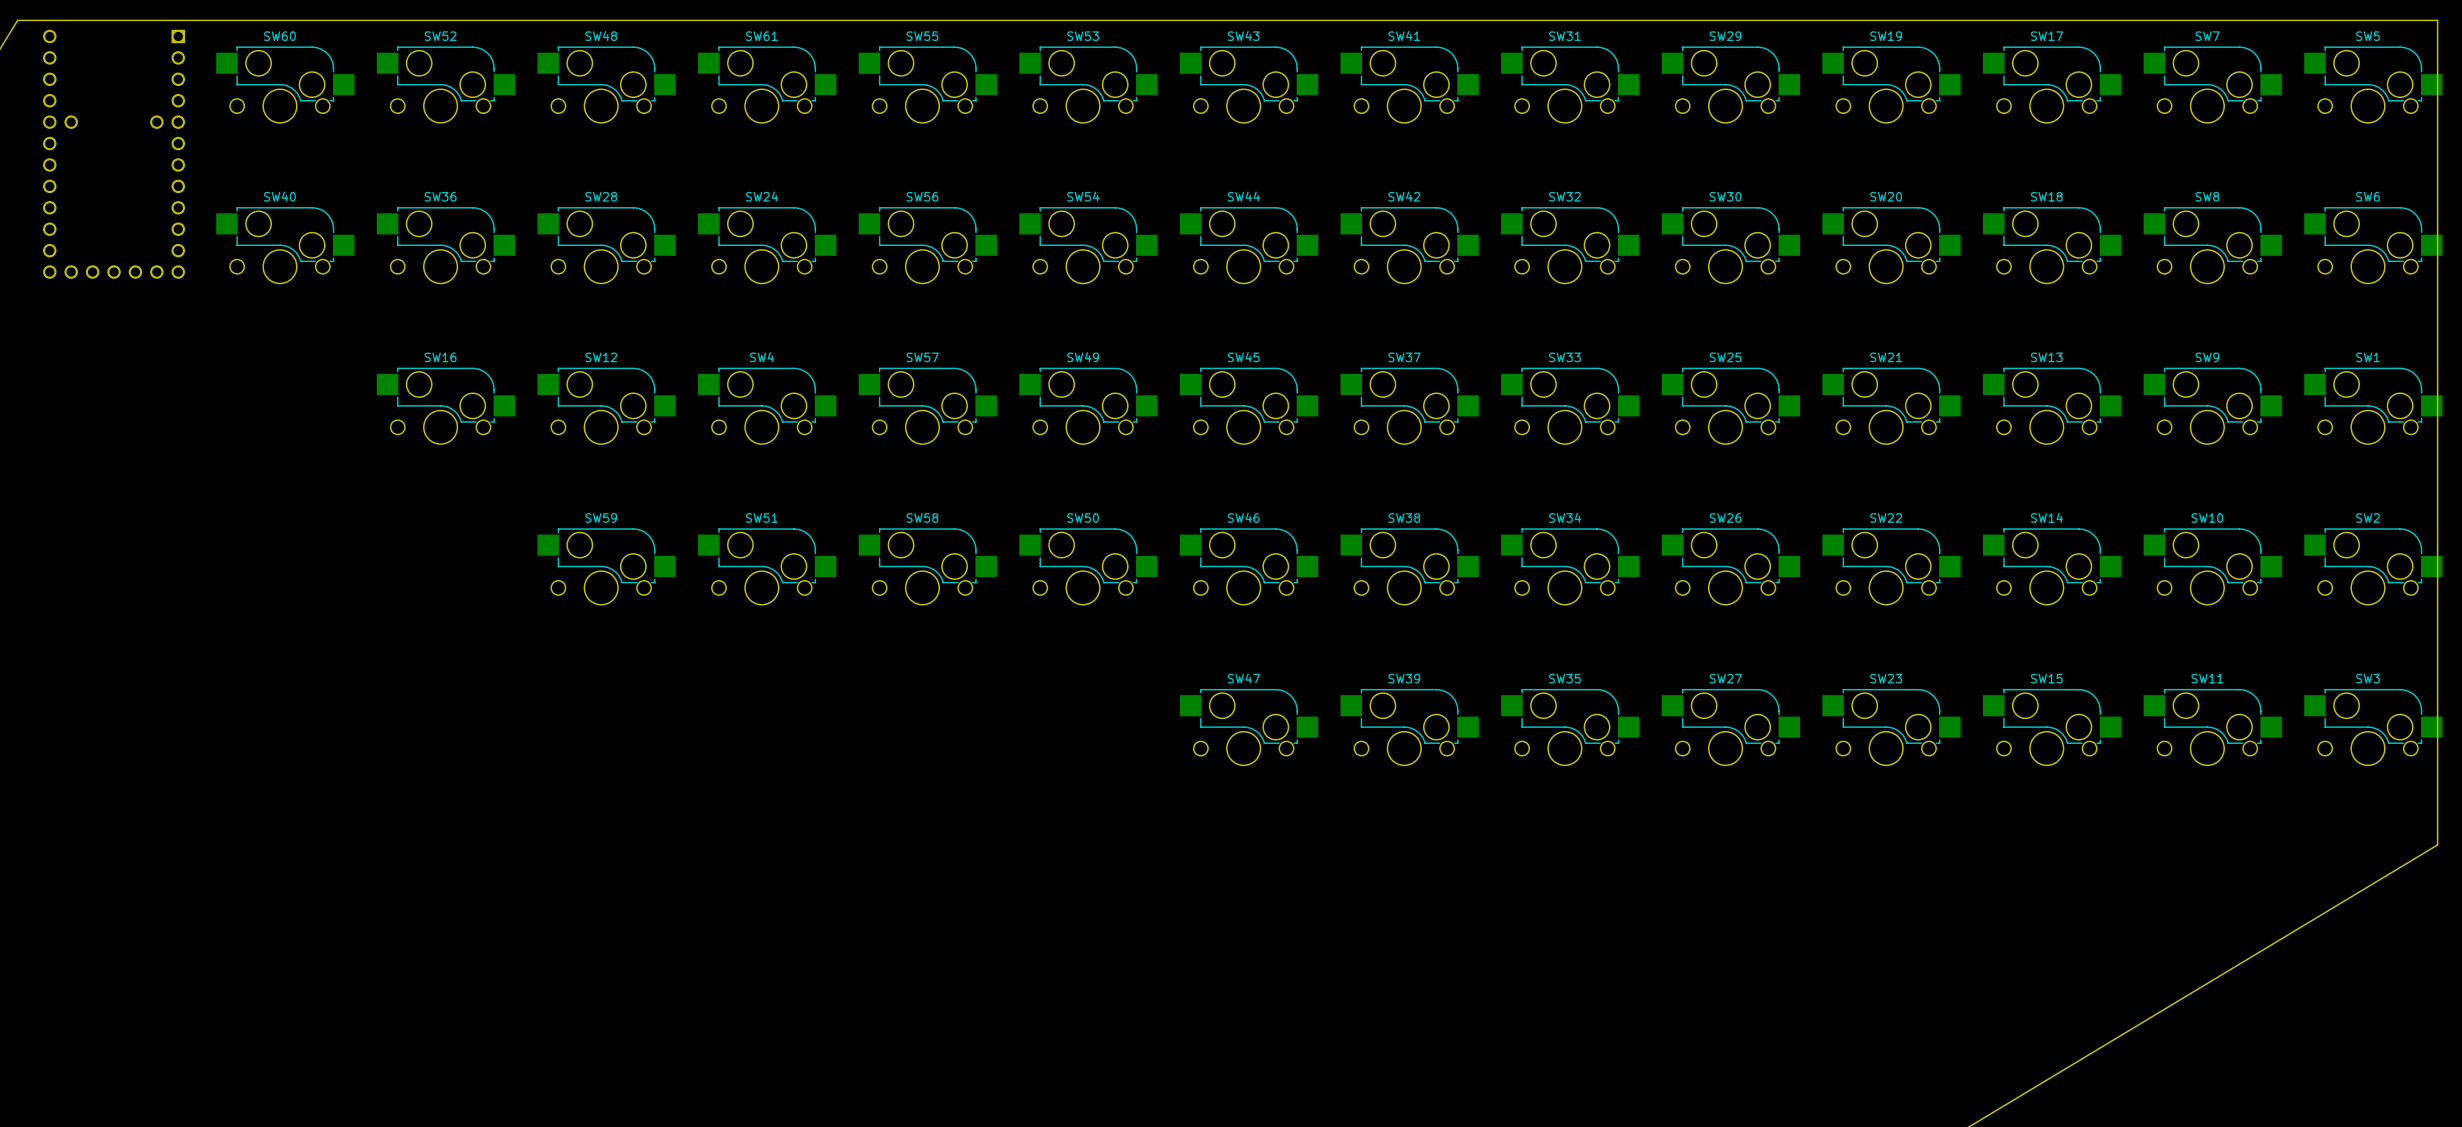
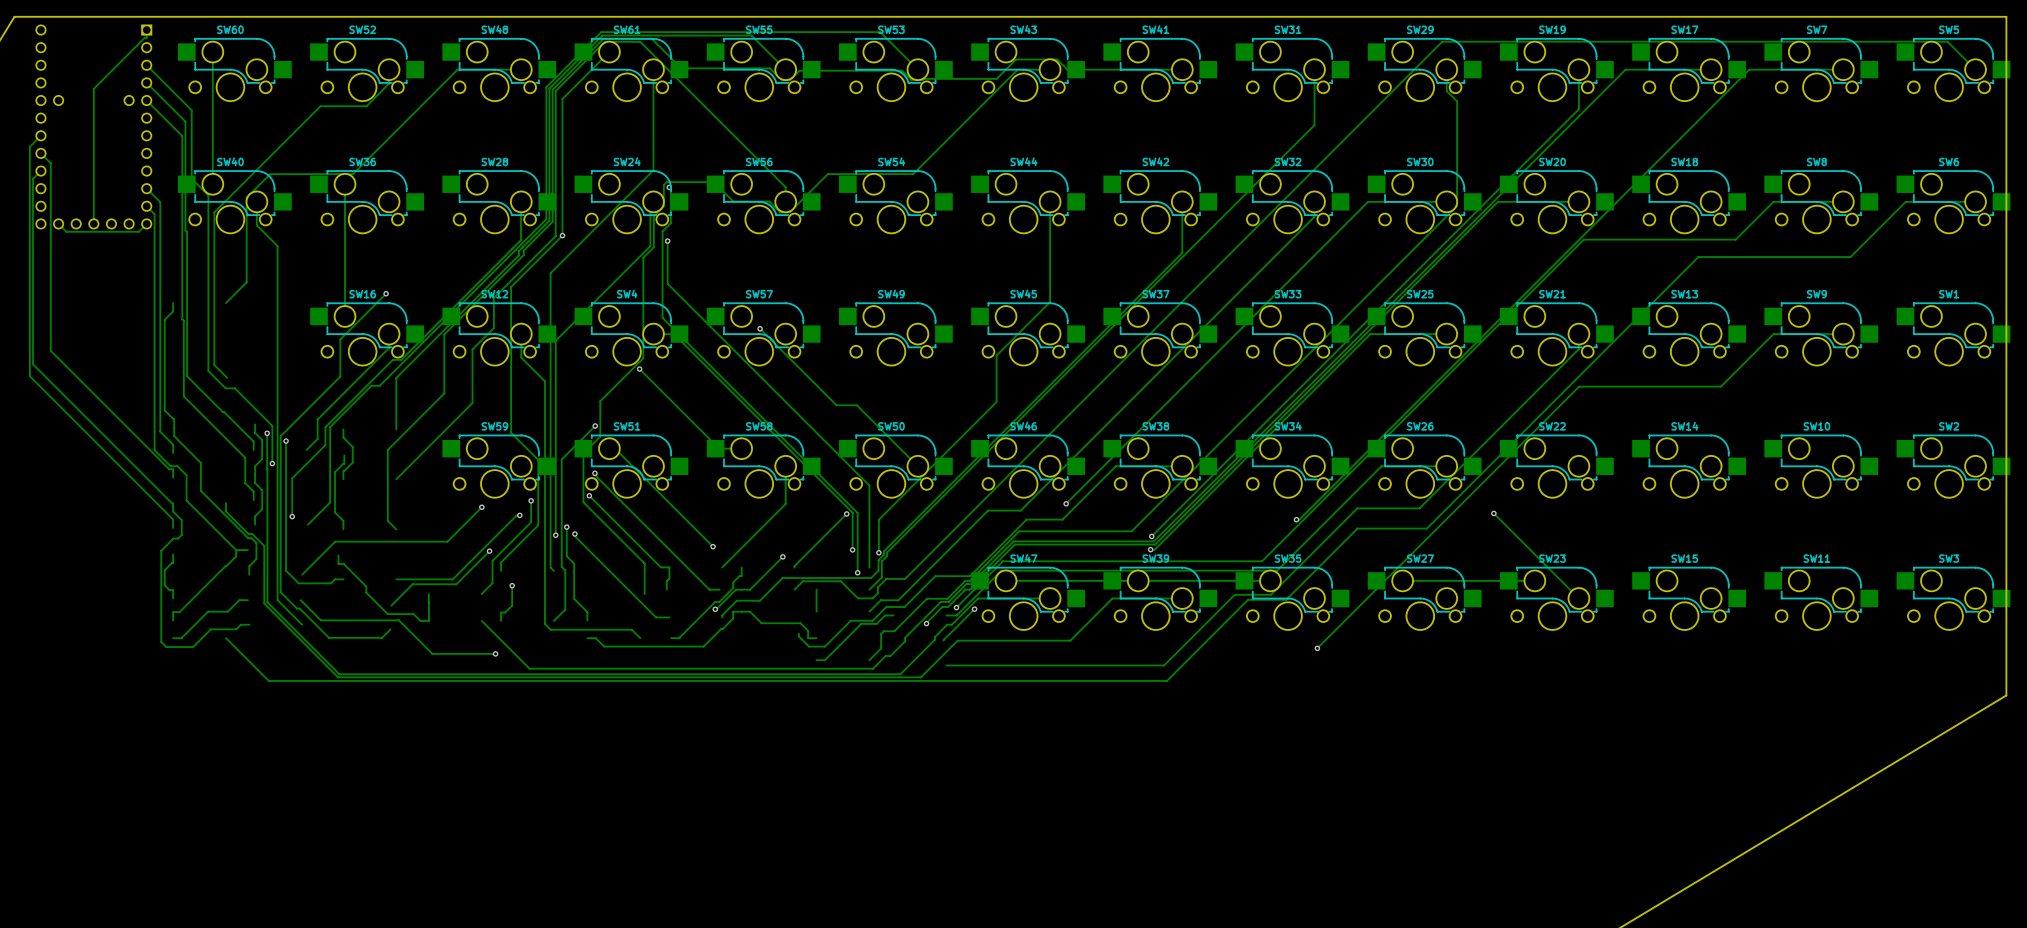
track: none -> (146, 30) (146, 37) (93, 88) (93, 223)
track: none -> (212, 52) (212, 184)
track: none -> (609, 52) (562, 99) (562, 235) (511, 286) (511, 432) (538, 459) (538, 525) (501, 562) (501, 570)
track: none -> (146, 65) (191, 110) (191, 178) (208, 195) (208, 371) (225, 388) (234, 388) (272, 425) (272, 463)
track: none -> (389, 69) (389, 83) (366, 106) (320, 106) (214, 212) (214, 364) (227, 377)
track: none -> (521, 69) (457, 69) (353, 174) (270, 174) (246, 197) (246, 282) (226, 302)
track: none -> (653, 69) (653, 170) (550, 273) (550, 567) (553, 570)
track: none -> (785, 69) (751, 35) (602, 35) (549, 88) (549, 220) (518, 251) (518, 255) (396, 377) (396, 429)
track: none -> (917, 69) (880, 32) (601, 32) (546, 87) (546, 219) (379, 385) (371, 385) (330, 427) (330, 502) (308, 524)
track: none -> (1050, 69) (1017, 69) (913, 174) (827, 174) (789, 212) (780, 212) (769, 201) (733, 201) (713, 182) (666, 182) (663, 185) (663, 206) (653, 216) (653, 247) (643, 257) (643, 358) (600, 401) (600, 436) (583, 453) (583, 502) (644, 563) (644, 594)
track: none -> (1182, 69) (1067, 69) (1057, 59) (1016, 59) (996, 78) (911, 79) (902, 70) (799, 70) (790, 80) (781, 80) (769, 68) (681, 68) (651, 38) (603, 38) (552, 89) (552, 221) (523, 250) (523, 255) (444, 334) (444, 393) (387, 449) (387, 520) (396, 529)
track: none -> (1314, 69) (1314, 125) (887, 552) (887, 556) (881, 561) (881, 577) (869, 589)
track: none -> (1446, 69) (1446, 90) (1457, 101) (1457, 205) (1131, 531) (1019, 531) (969, 580) (965, 580) (947, 598) (926, 598) (894, 631) (883, 631) (881, 633) (881, 648) (869, 660)
track: none -> (1578, 69) (1578, 109) (1151, 536)
track: none -> (1711, 69) (1625, 69) (1153, 541) (1013, 541) (970, 584) (966, 584) (948, 601) (940, 601) (905, 637) (905, 641) (890, 656) (885, 656) (873, 668) (529, 668) (481, 620)
track: none -> (1843, 69) (1749, 69) (1299, 519) (1296, 519)
track: none -> (1975, 69) (1947, 41) (1442, 41) (904, 578) (886, 578) (877, 587) (877, 593) (872, 598) (857, 598) (840, 581) (802, 581) (794, 589)
track: none -> (146, 82) (185, 121) (187, 376) (253, 441) (253, 450)
track: none -> (146, 100) (182, 136) (183, 396) (245, 457) (245, 483) (253, 491) (253, 500)
track: none -> (40, 135) (29, 146) (29, 376) (173, 519) (173, 527)
track: none -> (40, 153) (50, 163) (50, 350) (169, 469) (173, 469) (173, 477)
track: none -> (40, 171) (32, 179) (32, 364) (173, 504)
track: none -> (345, 184) (345, 316)
track: none -> (669, 187) (670, 223) (662, 231) (662, 317) (857, 513) (857, 572)
via: none -> (669, 187)
track: none -> (146, 188) (160, 202) (160, 431) (173, 444) (173, 453)
track: none -> (256, 201) (256, 225) (277, 246) (277, 600) (302, 624)
track: none -> (521, 201) (521, 240) (401, 359) (392, 359) (325, 427) (325, 445) (292, 478) (292, 516)
track: none -> (653, 201) (650, 205) (650, 246) (555, 340) (555, 535)
track: none -> (785, 201) (785, 187) (640, 41) (604, 41) (555, 91) (555, 236) (493, 297) (493, 328) (472, 349) (472, 403) (396, 479)
track: none -> (1050, 201) (1050, 302) (996, 355) (996, 402) (878, 519) (878, 552)
track: none -> (1182, 201) (1182, 252) (883, 551) (883, 554) (878, 560) (878, 570) (871, 578) (782, 578) (759, 600) (736, 600) (722, 617)
track: none -> (1314, 201) (1314, 216) (1020, 510) (988, 510) (898, 600) (880, 600) (869, 611)
track: none -> (1446, 201) (1368, 201) (1066, 503)
track: none -> (1578, 201) (1497, 201) (1155, 544) (1014, 544) (969, 589) (965, 589) (948, 607) (942, 607) (926, 623)
track: none -> (1843, 201) (1773, 201) (1735, 239) (1583, 239) (1262, 561) (1002, 561) (956, 607)
track: none -> (1975, 201) (1905, 201) (1850, 257) (1698, 257) (1426, 528) (1357, 528) (1286, 599) (1248, 599) (1166, 680) (268, 680) (226, 638)
track: none -> (146, 206) (154, 214) (154, 450) (170, 466) (177, 466) (186, 475) (186, 500) (236, 550)
track: none -> (146, 223) (138, 231) (66, 231) (58, 223)
via: none -> (562, 235)
track: none -> (667, 241) (667, 283) (869, 485) (869, 567)
via: none -> (667, 241)
track: none -> (386, 293) (340, 339) (340, 376) (280, 436) (280, 592) (329, 637) (382, 637) (390, 629)
via: none -> (386, 293)
track: none -> (173, 302) (173, 311) (164, 319) (164, 410) (174, 419) (174, 436) (200, 462) (200, 490) (248, 538) (251, 538) (256, 542) (256, 559) (249, 566) (249, 574)
track: none -> (760, 328) (836, 405) (856, 405) (917, 466)
via: none -> (760, 328)
track: none -> (389, 334) (389, 348) (317, 419) (317, 438) (306, 450)
track: none -> (521, 334) (521, 357) (544, 381) (544, 623) (550, 629) (631, 629) (640, 638)
track: none -> (653, 334) (673, 334) (852, 512) (852, 549)
track: none -> (1446, 334) (1370, 334) (1154, 549) (1150, 549)
track: none -> (1578, 334) (1578, 348) (1419, 508) (1357, 508) (1270, 594) (1234, 594) (1164, 665) (946, 665)
track: none -> (1843, 334) (1773, 334) (1721, 386) (1579, 386) (1317, 648)
track: none -> (639, 369) (719, 448) (741, 448)
via: none -> (639, 369)
track: none -> (255, 424) (255, 433) (262, 440) (262, 459) (255, 466) (255, 483) (262, 490) (262, 509) (255, 516) (255, 524)
track: none -> (595, 425) (561, 459) (561, 566) (565, 570) (565, 609) (553, 620)
via: none -> (595, 425)
track: none -> (343, 429) (343, 437) (352, 447) (352, 462) (343, 470) (343, 479)
track: none -> (267, 433) (267, 602) (339, 674) (900, 674) (947, 624) (951, 624) (978, 598) (1050, 598)
via: none -> (267, 433)
track: none -> (286, 441) (286, 570) (298, 583) (331, 583) (335, 579) (343, 579)
via: none -> (286, 441)
track: none -> (609, 448) (615, 448) (713, 546)
track: none -> (344, 455) (344, 463) (335, 472) (335, 512) (343, 520) (343, 529)
via: none -> (272, 463)
track: none -> (785, 466) (785, 503) (722, 567)
track: none -> (1182, 466) (1115, 466) (1062, 519) (1026, 519) (970, 576) (935, 576) (904, 607) (886, 607) (872, 620) (850, 620) (824, 646) (809, 646) (798, 636) (798, 633)
track: none -> (1446, 466) (1381, 466) (1277, 570) (1001, 570) (956, 615) (946, 615)
track: none -> (594, 473) (709, 589) (719, 589)
via: none -> (594, 473)
track: none -> (589, 495) (660, 567) (669, 567) (666, 589)
via: none -> (589, 495)
track: none -> (531, 500) (531, 522) (492, 560) (492, 583) (481, 594)
via: none -> (531, 500)
track: none -> (173, 503) (173, 511) (181, 520) (181, 534) (178, 538) (173, 538) (161, 550) (161, 641) (166, 647) (193, 647) (210, 629) (236, 629) (240, 624) (249, 624)
track: none -> (226, 503) (226, 511) (248, 534) (252, 534) (264, 545) (264, 603) (338, 677) (920, 677) (957, 640) (1070, 640) (1112, 598) (1182, 598)
via: none -> (1066, 503)
track: none -> (481, 507) (447, 541) (335, 541) (302, 574)
via: none -> (481, 507)
track: none -> (1493, 513) (1578, 598)
via: none -> (1493, 513)
track: none -> (846, 513) (794, 567)
via: none -> (846, 513)
track: none -> (519, 515) (516, 515) (452, 579) (396, 579)
via: none -> (519, 515)
via: none -> (292, 516)
via: none -> (1296, 519)
track: none -> (566, 527) (566, 556) (574, 563) (574, 598) (587, 612) (587, 620)
via: none -> (566, 527)
track: none -> (574, 534) (574, 536) (656, 617) (669, 617)
via: none -> (574, 534)
via: none -> (555, 535)
via: none -> (1151, 536)
via: none -> (713, 546)
via: none -> (1150, 549)
track: none -> (236, 550) (236, 556) (226, 566) (179, 612) (173, 612) (173, 620)
track: none -> (247, 550) (236, 550)
via: none -> (852, 549)
track: none -> (489, 551) (456, 584) (412, 584) (391, 605)
via: none -> (489, 551)
via: none -> (878, 552)
track: none -> (173, 554) (173, 562) (164, 570) (164, 585) (169, 590) (173, 590) (173, 598)
track: none -> (338, 555) (338, 563) (343, 563) (366, 586) (366, 592) (387, 614) (413, 614) (420, 620) (428, 620) (428, 594)
track: none -> (782, 556) (750, 589) (735, 589) (715, 609)
via: none -> (782, 556)
track: none -> (741, 567) (741, 576) (733, 582) (733, 588) (719, 602) (715, 602) (679, 638) (671, 638)
via: none -> (857, 572)
track: none -> (1270, 580) (1006, 580)
track: none -> (1534, 580) (1402, 580)
track: none -> (512, 585) (512, 605) (505, 612) (501, 612) (501, 620)
via: none -> (512, 585)
track: none -> (816, 589) (816, 611)
track: none -> (247, 600) (239, 600) (227, 611) (208, 611) (181, 638) (173, 638)
track: none -> (300, 600) (320, 620) (398, 620) (432, 653) (495, 653)
via: none -> (956, 607)
via: none -> (715, 609)
track: none -> (974, 609) (943, 640)
via: none -> (974, 609)
track: none -> (893, 615) (885, 615) (876, 623) (861, 623) (824, 660) (816, 660)
via: none -> (926, 623)
track: none -> (816, 638) (808, 638) (808, 630) (800, 623) (761, 623) (750, 611) (733, 611) (733, 618) (703, 646) (604, 646) (595, 638) (587, 638)
via: none -> (1317, 648)
via: none -> (495, 653)

